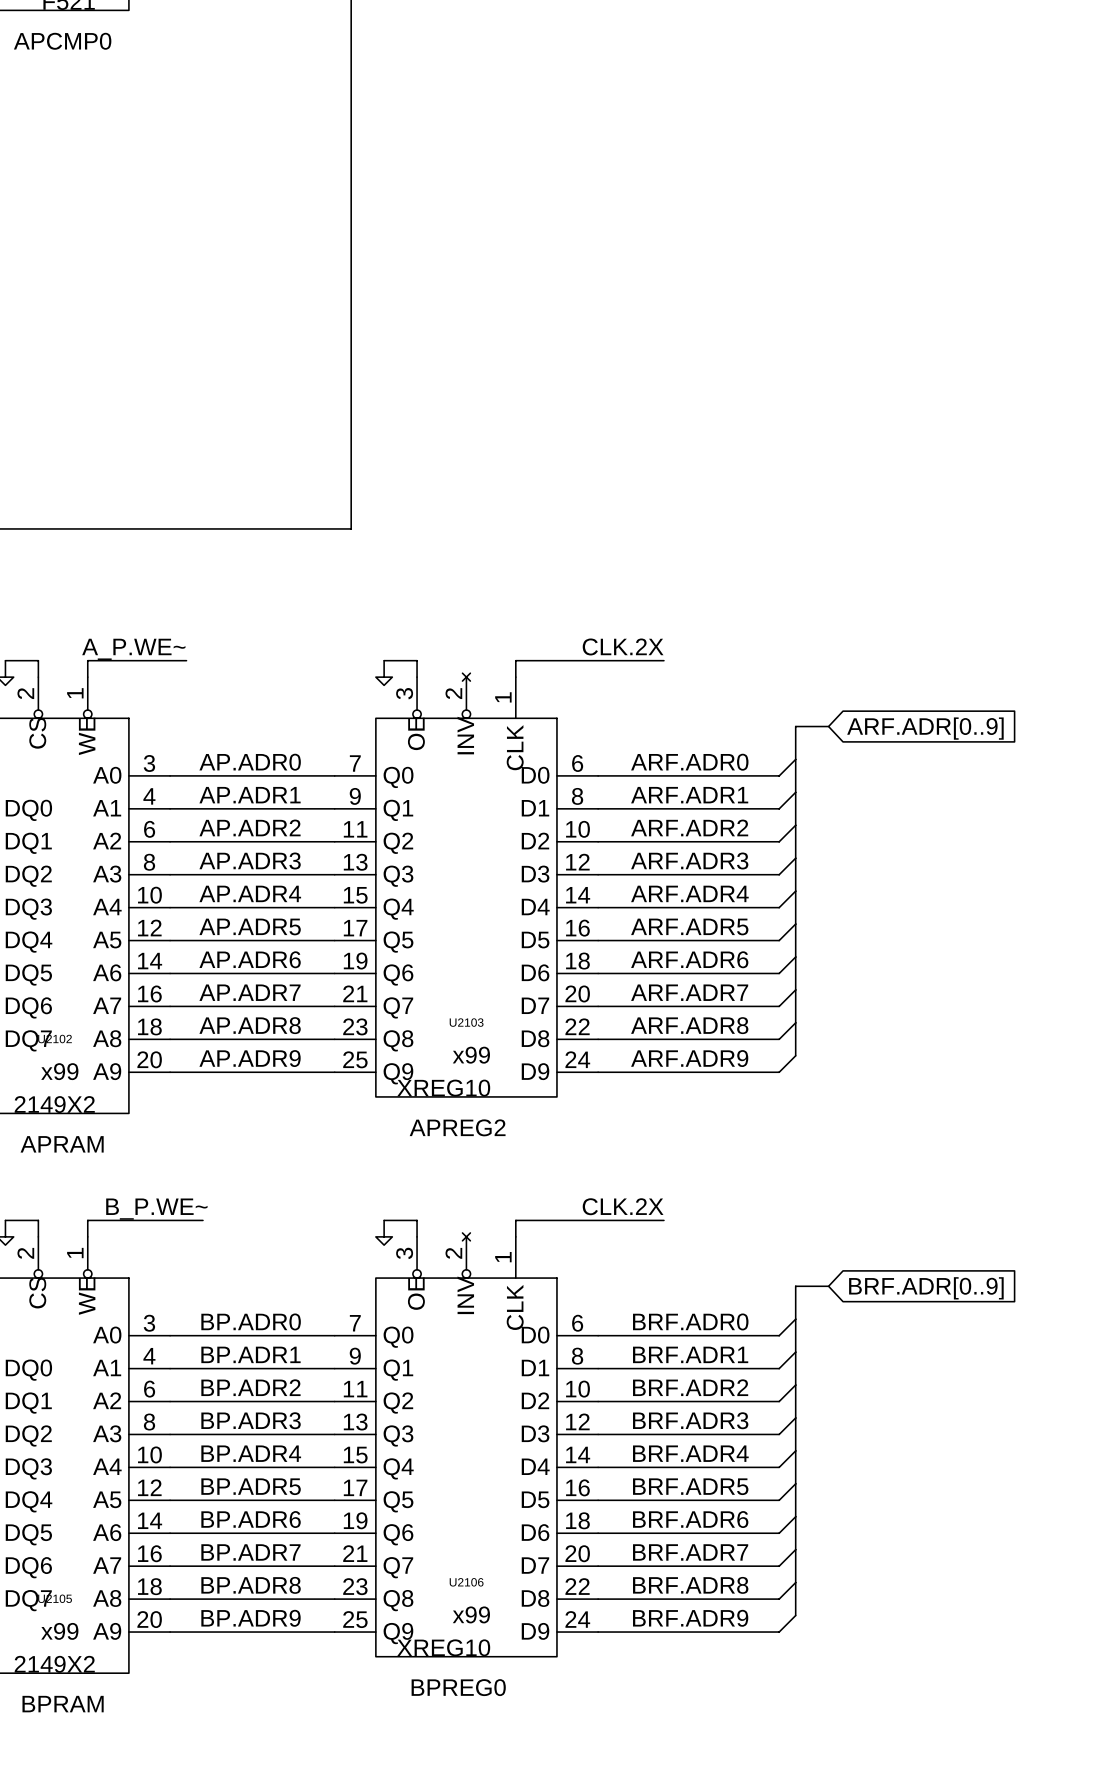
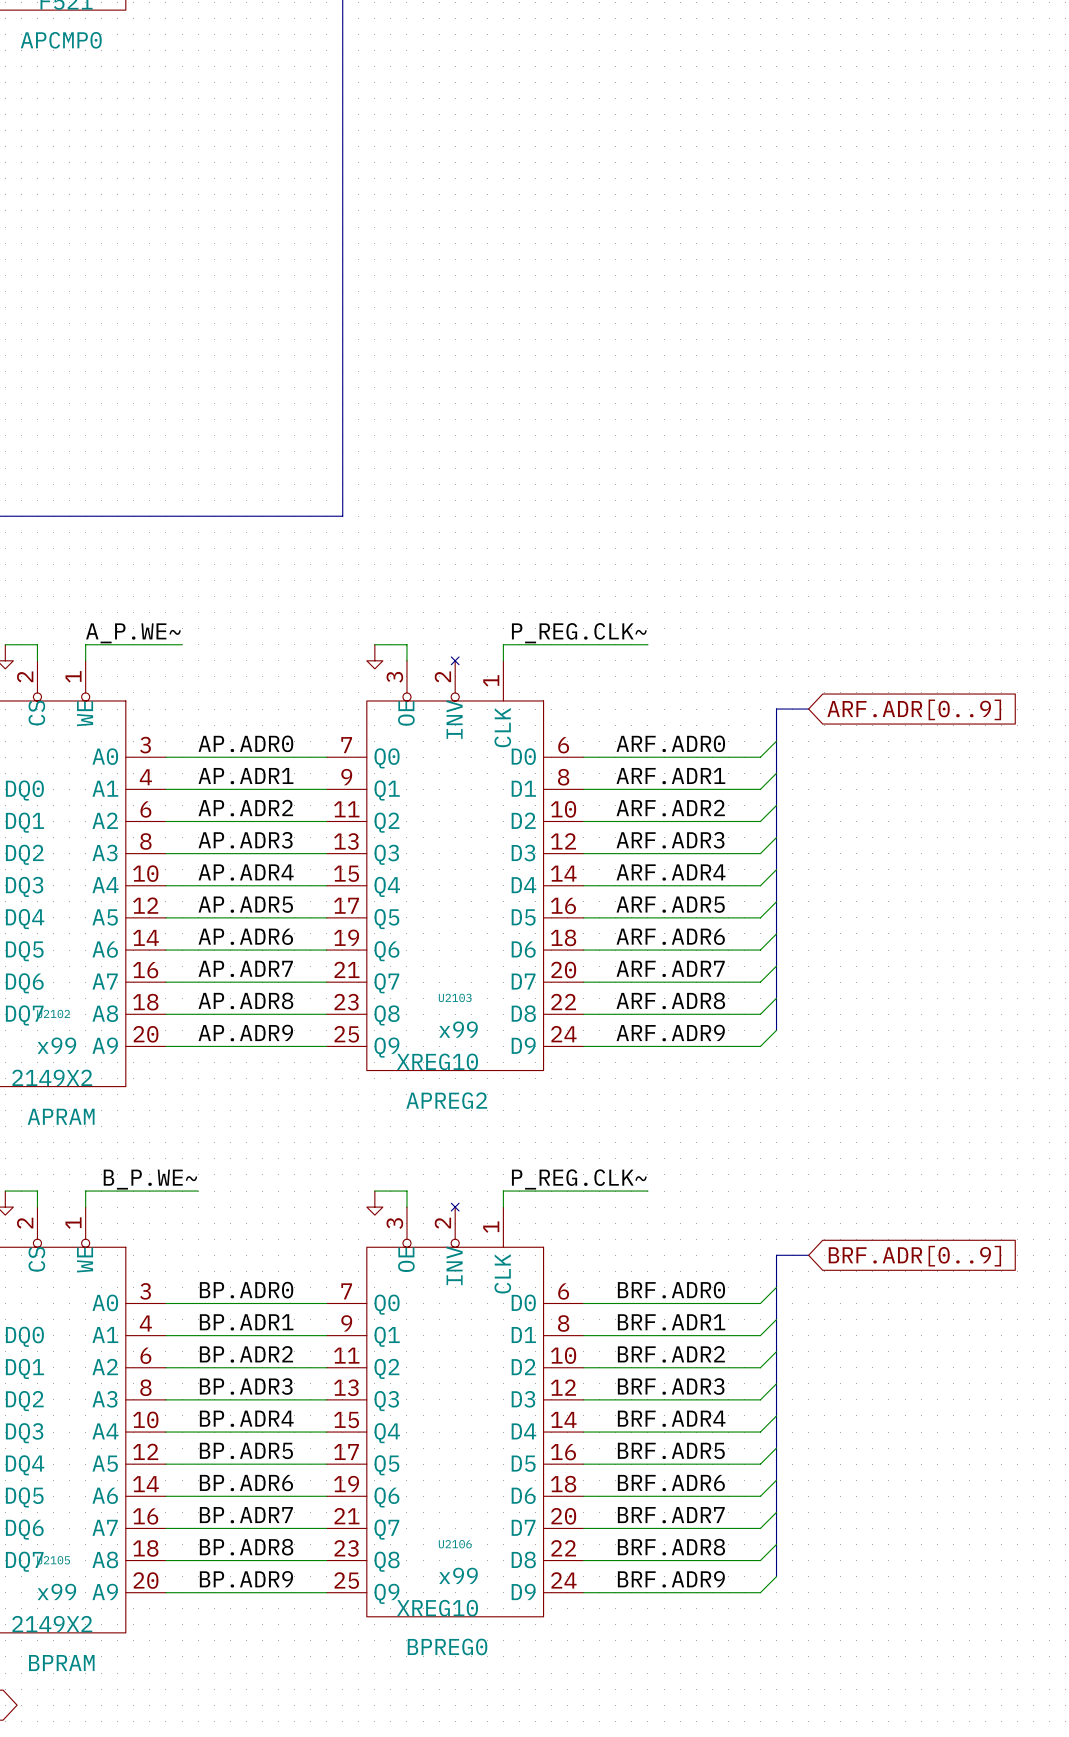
label: CLK.2X (623, 646) -> P_REG.CLK~ (579, 633)
label: CLK.2X (623, 1206) -> P_REG.CLK~ (579, 1179)

